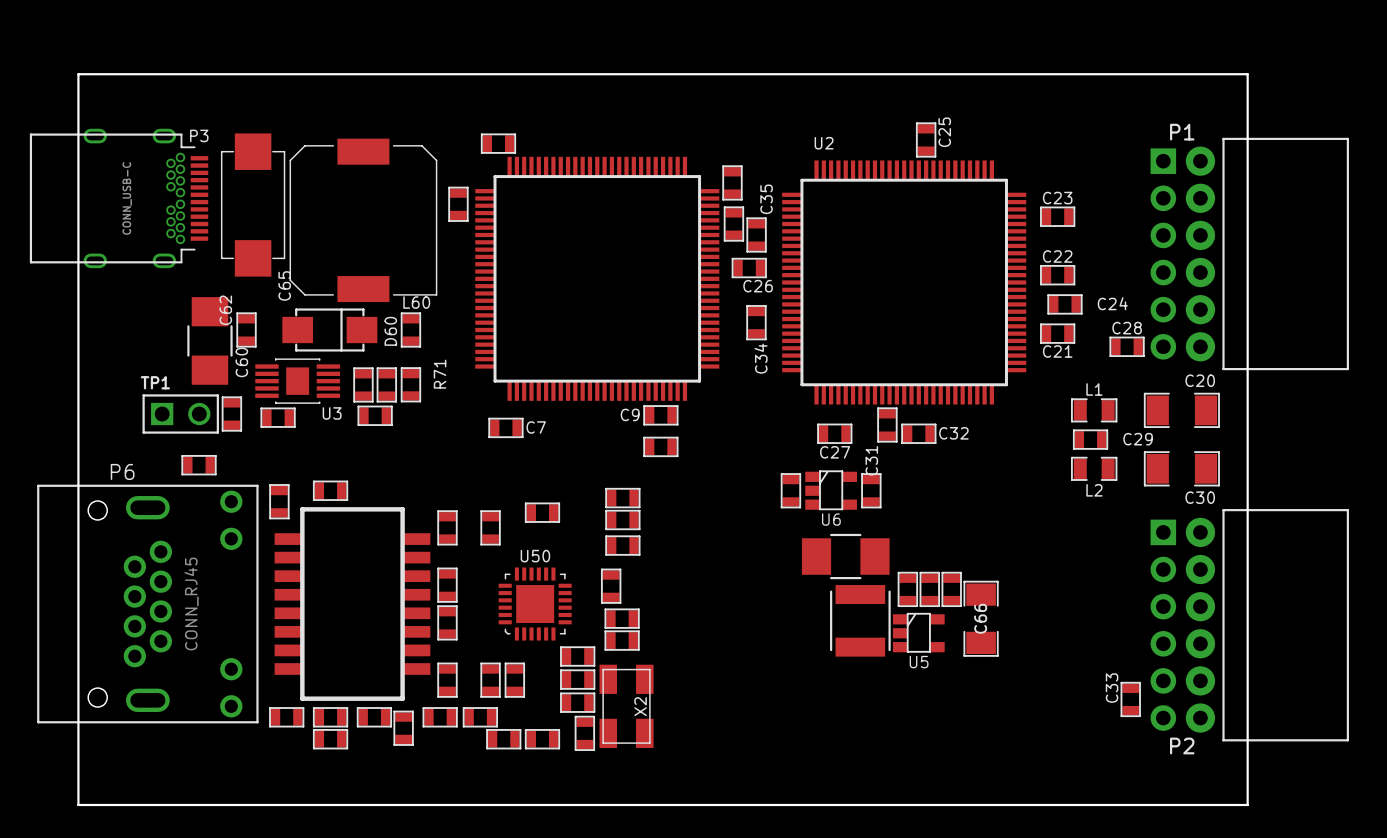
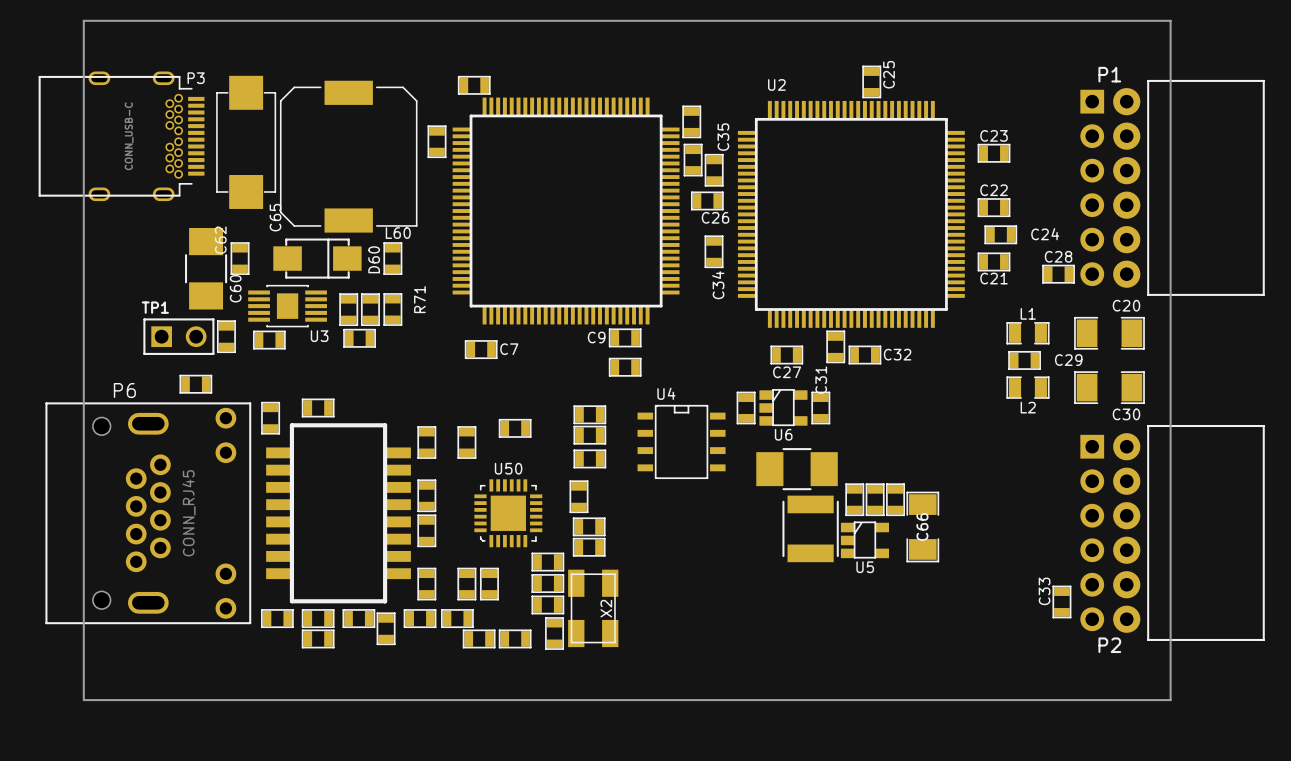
U4: none -> (681, 441)

